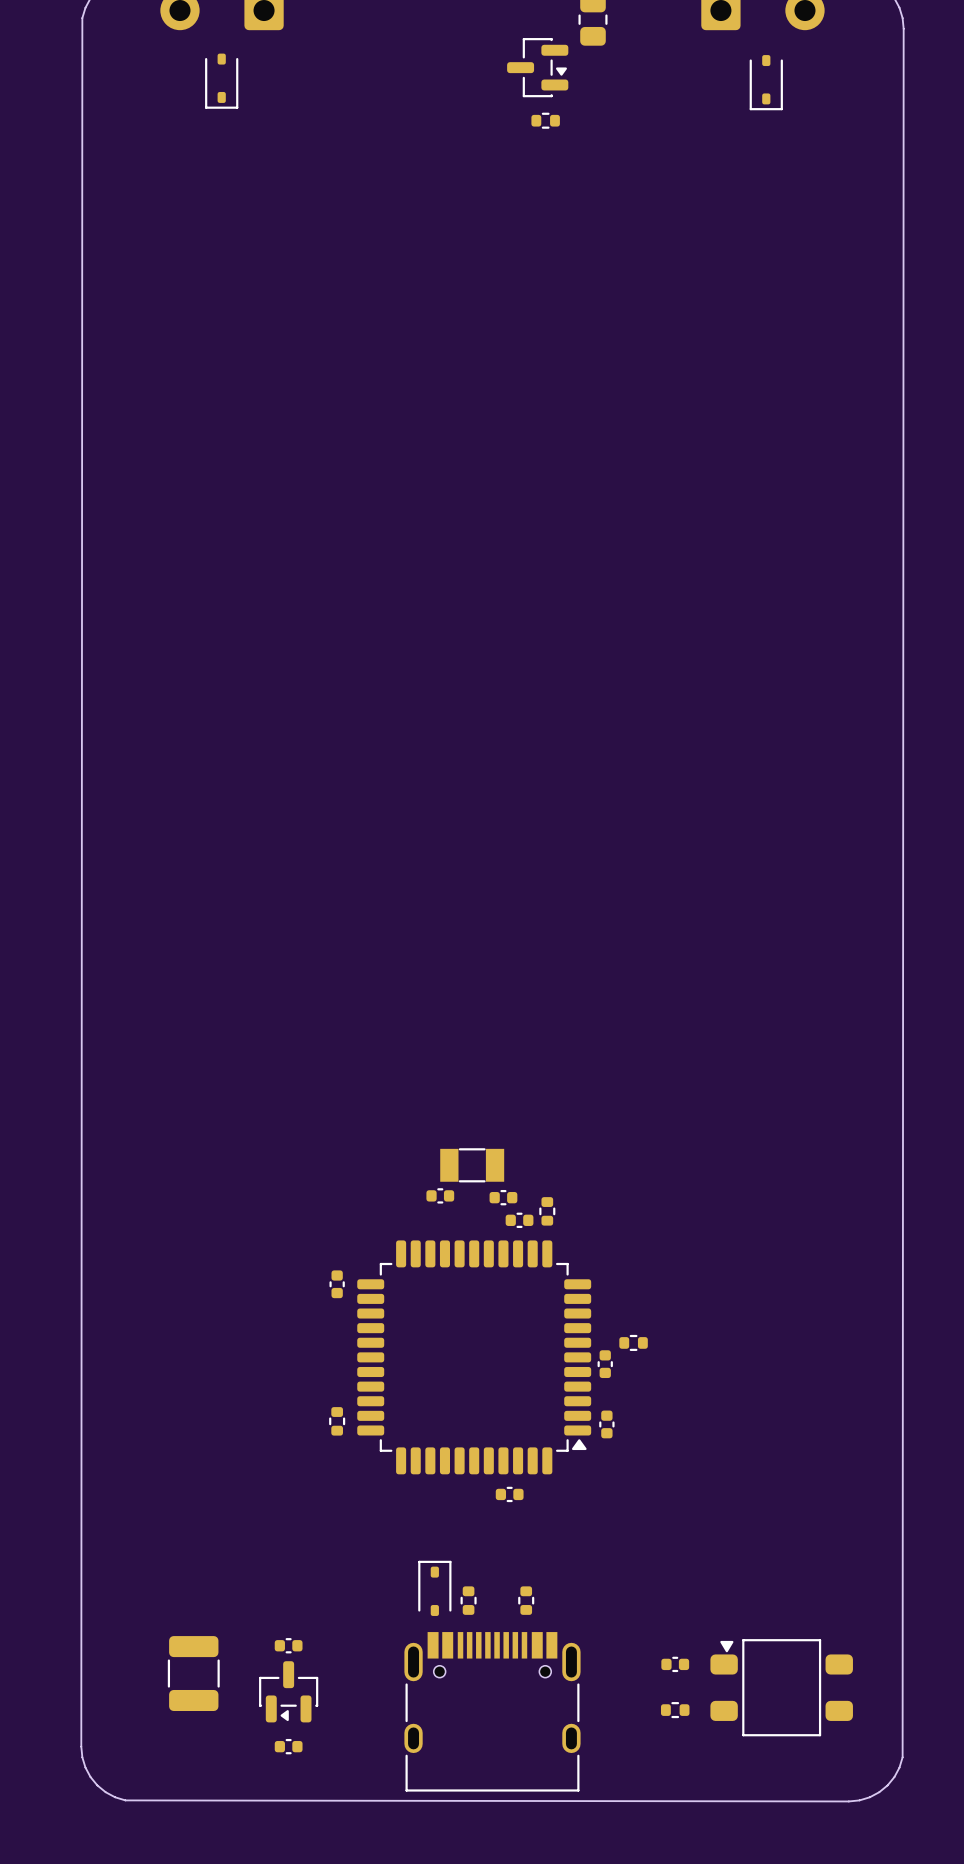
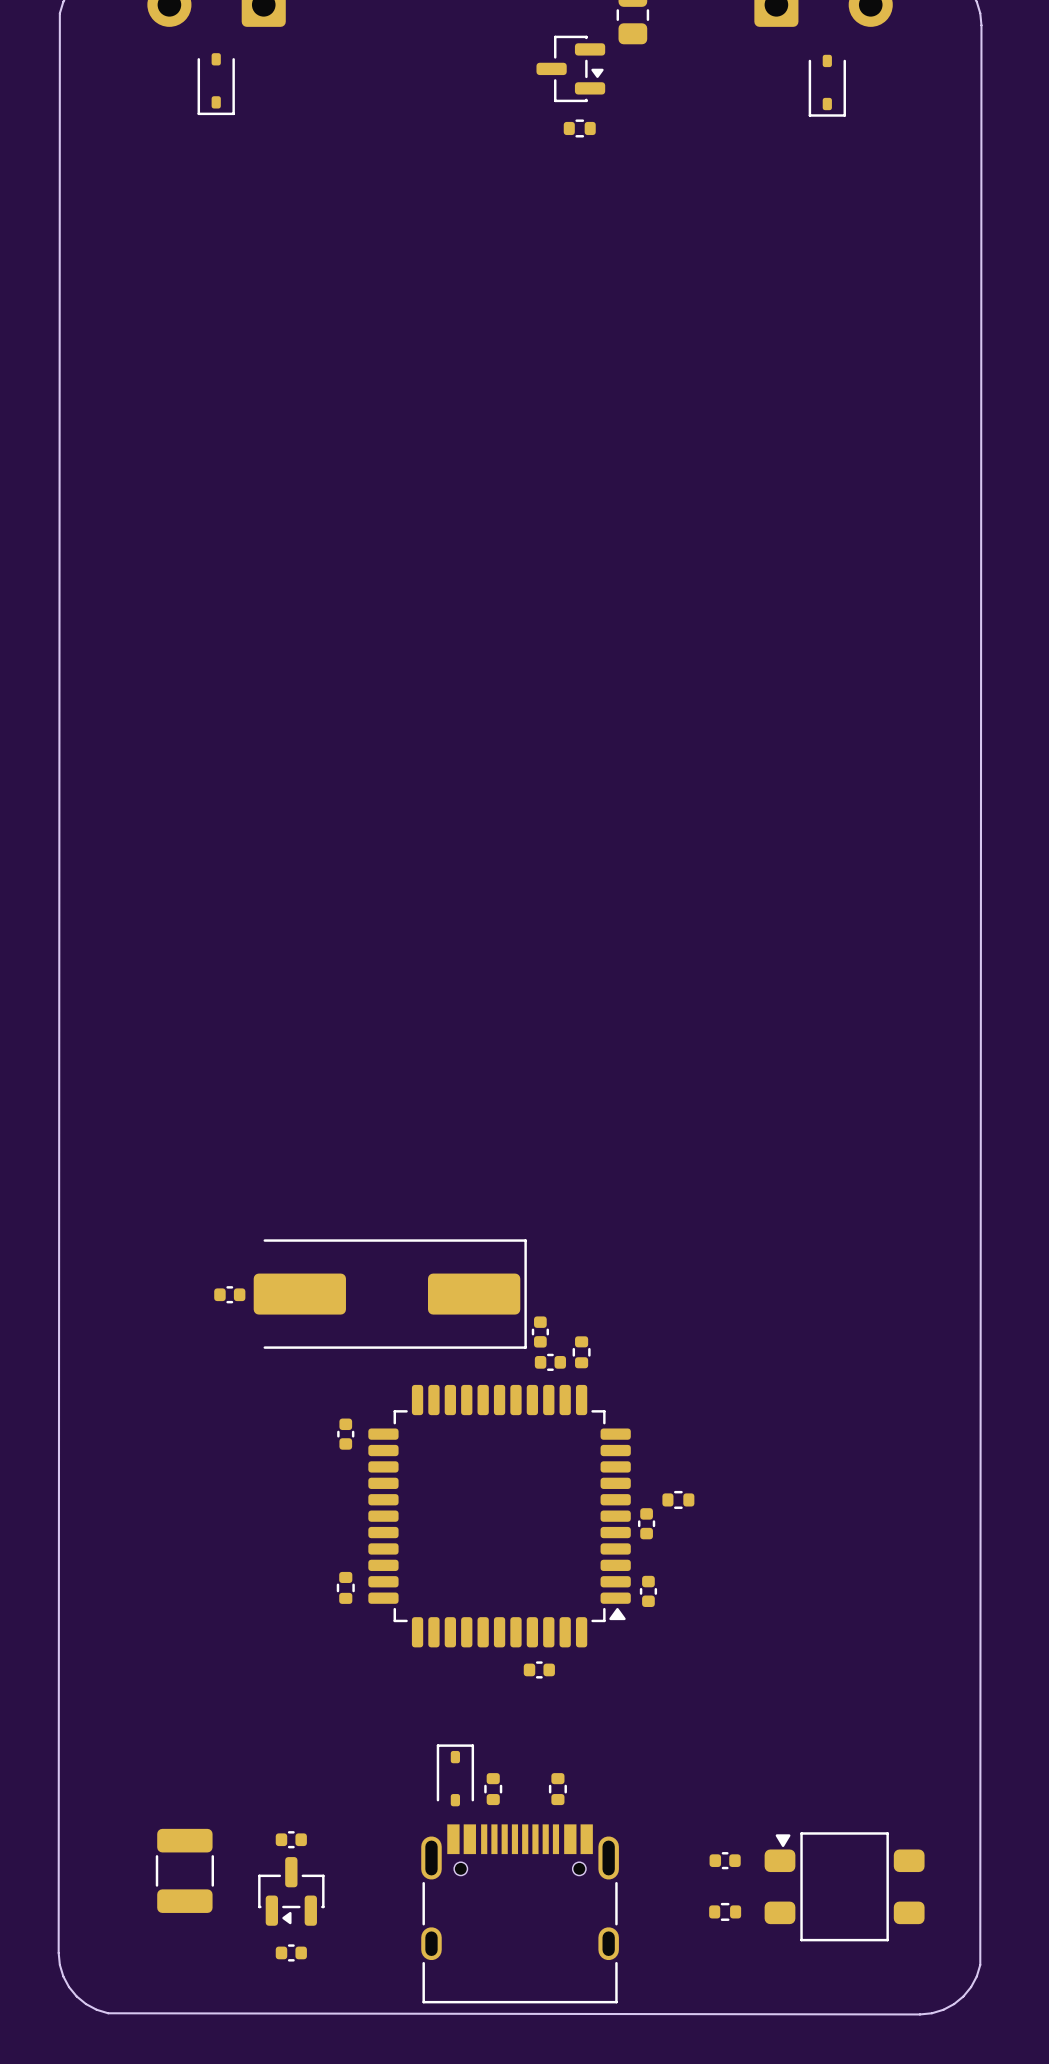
part: none -> (390, 1294)
part: (472, 1165) -> none
part position: (440, 1195) -> (229, 1294)
part rotation: 0° (503, 1197) -> 90° clockwise (540, 1332)

